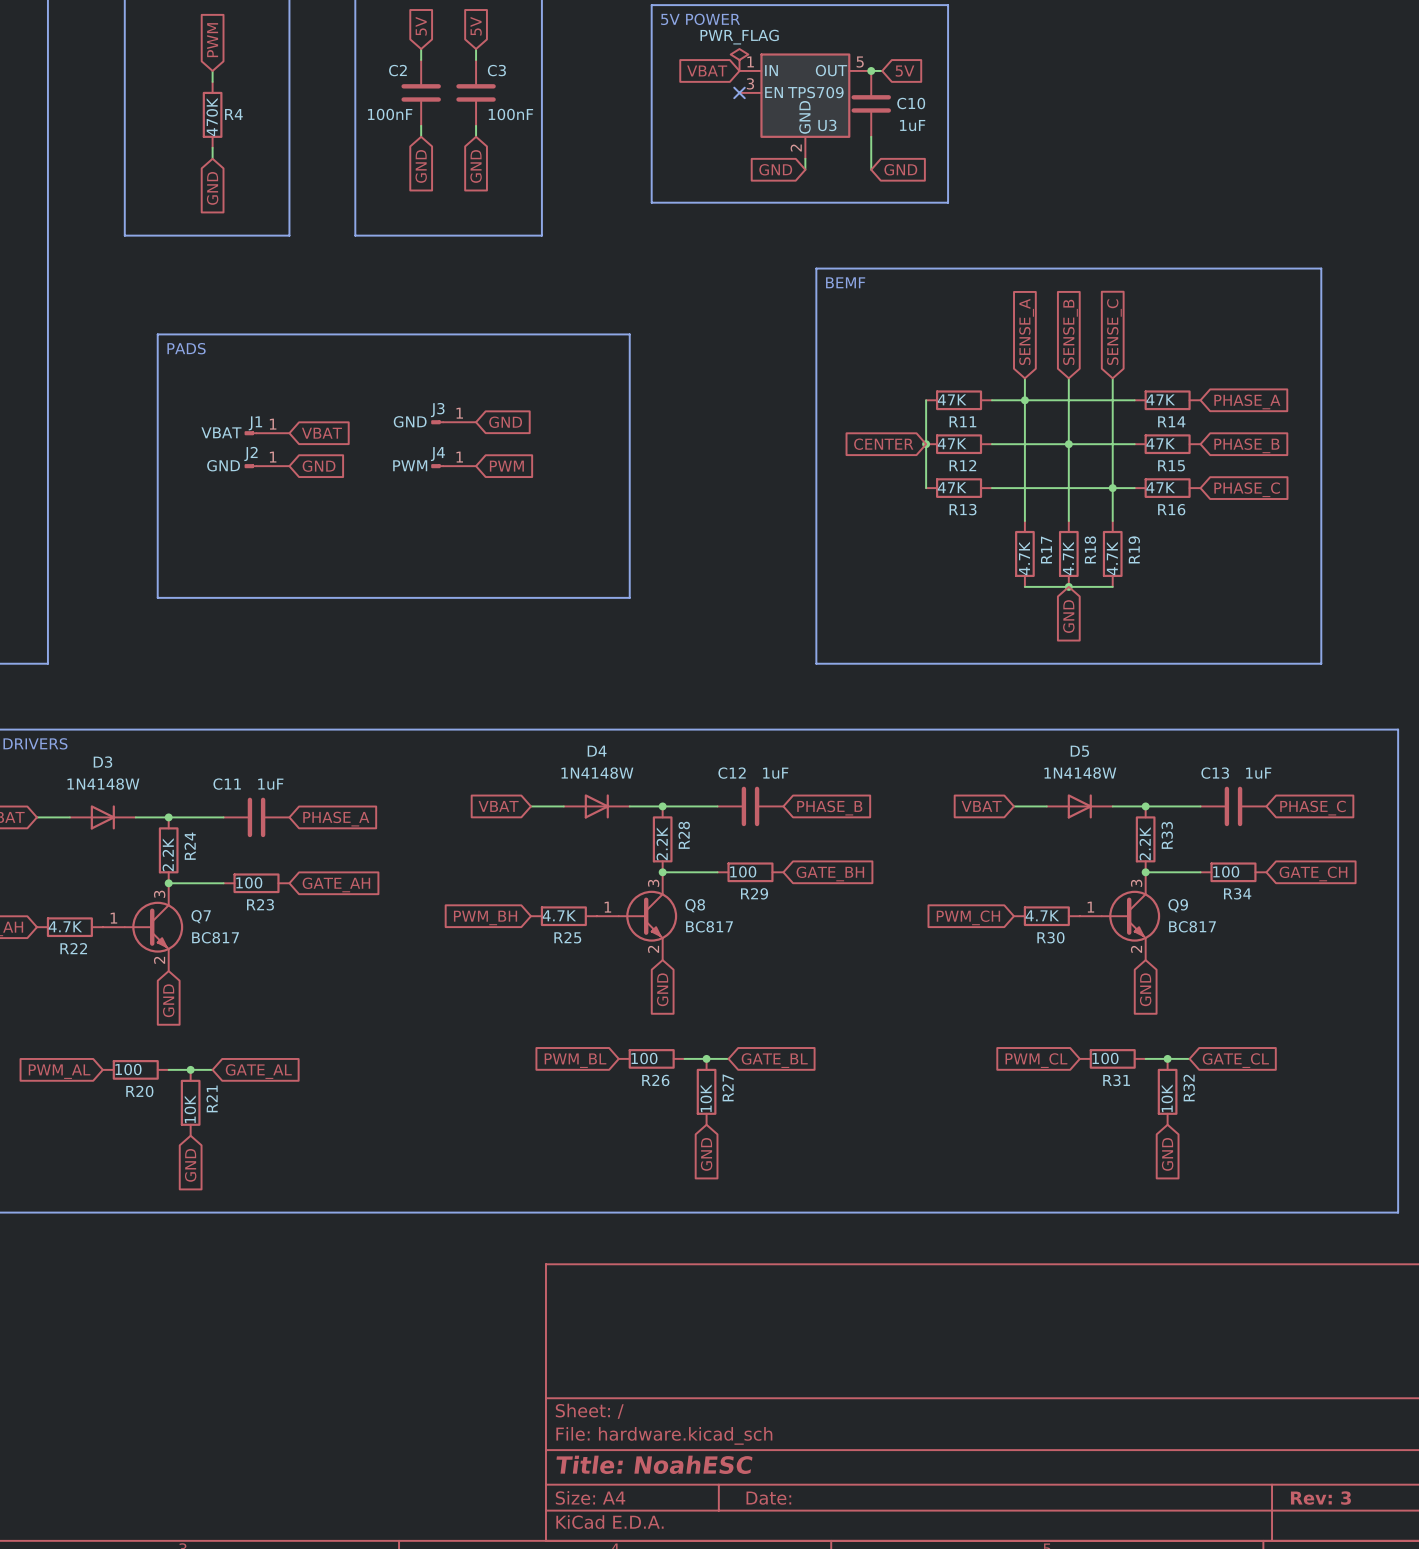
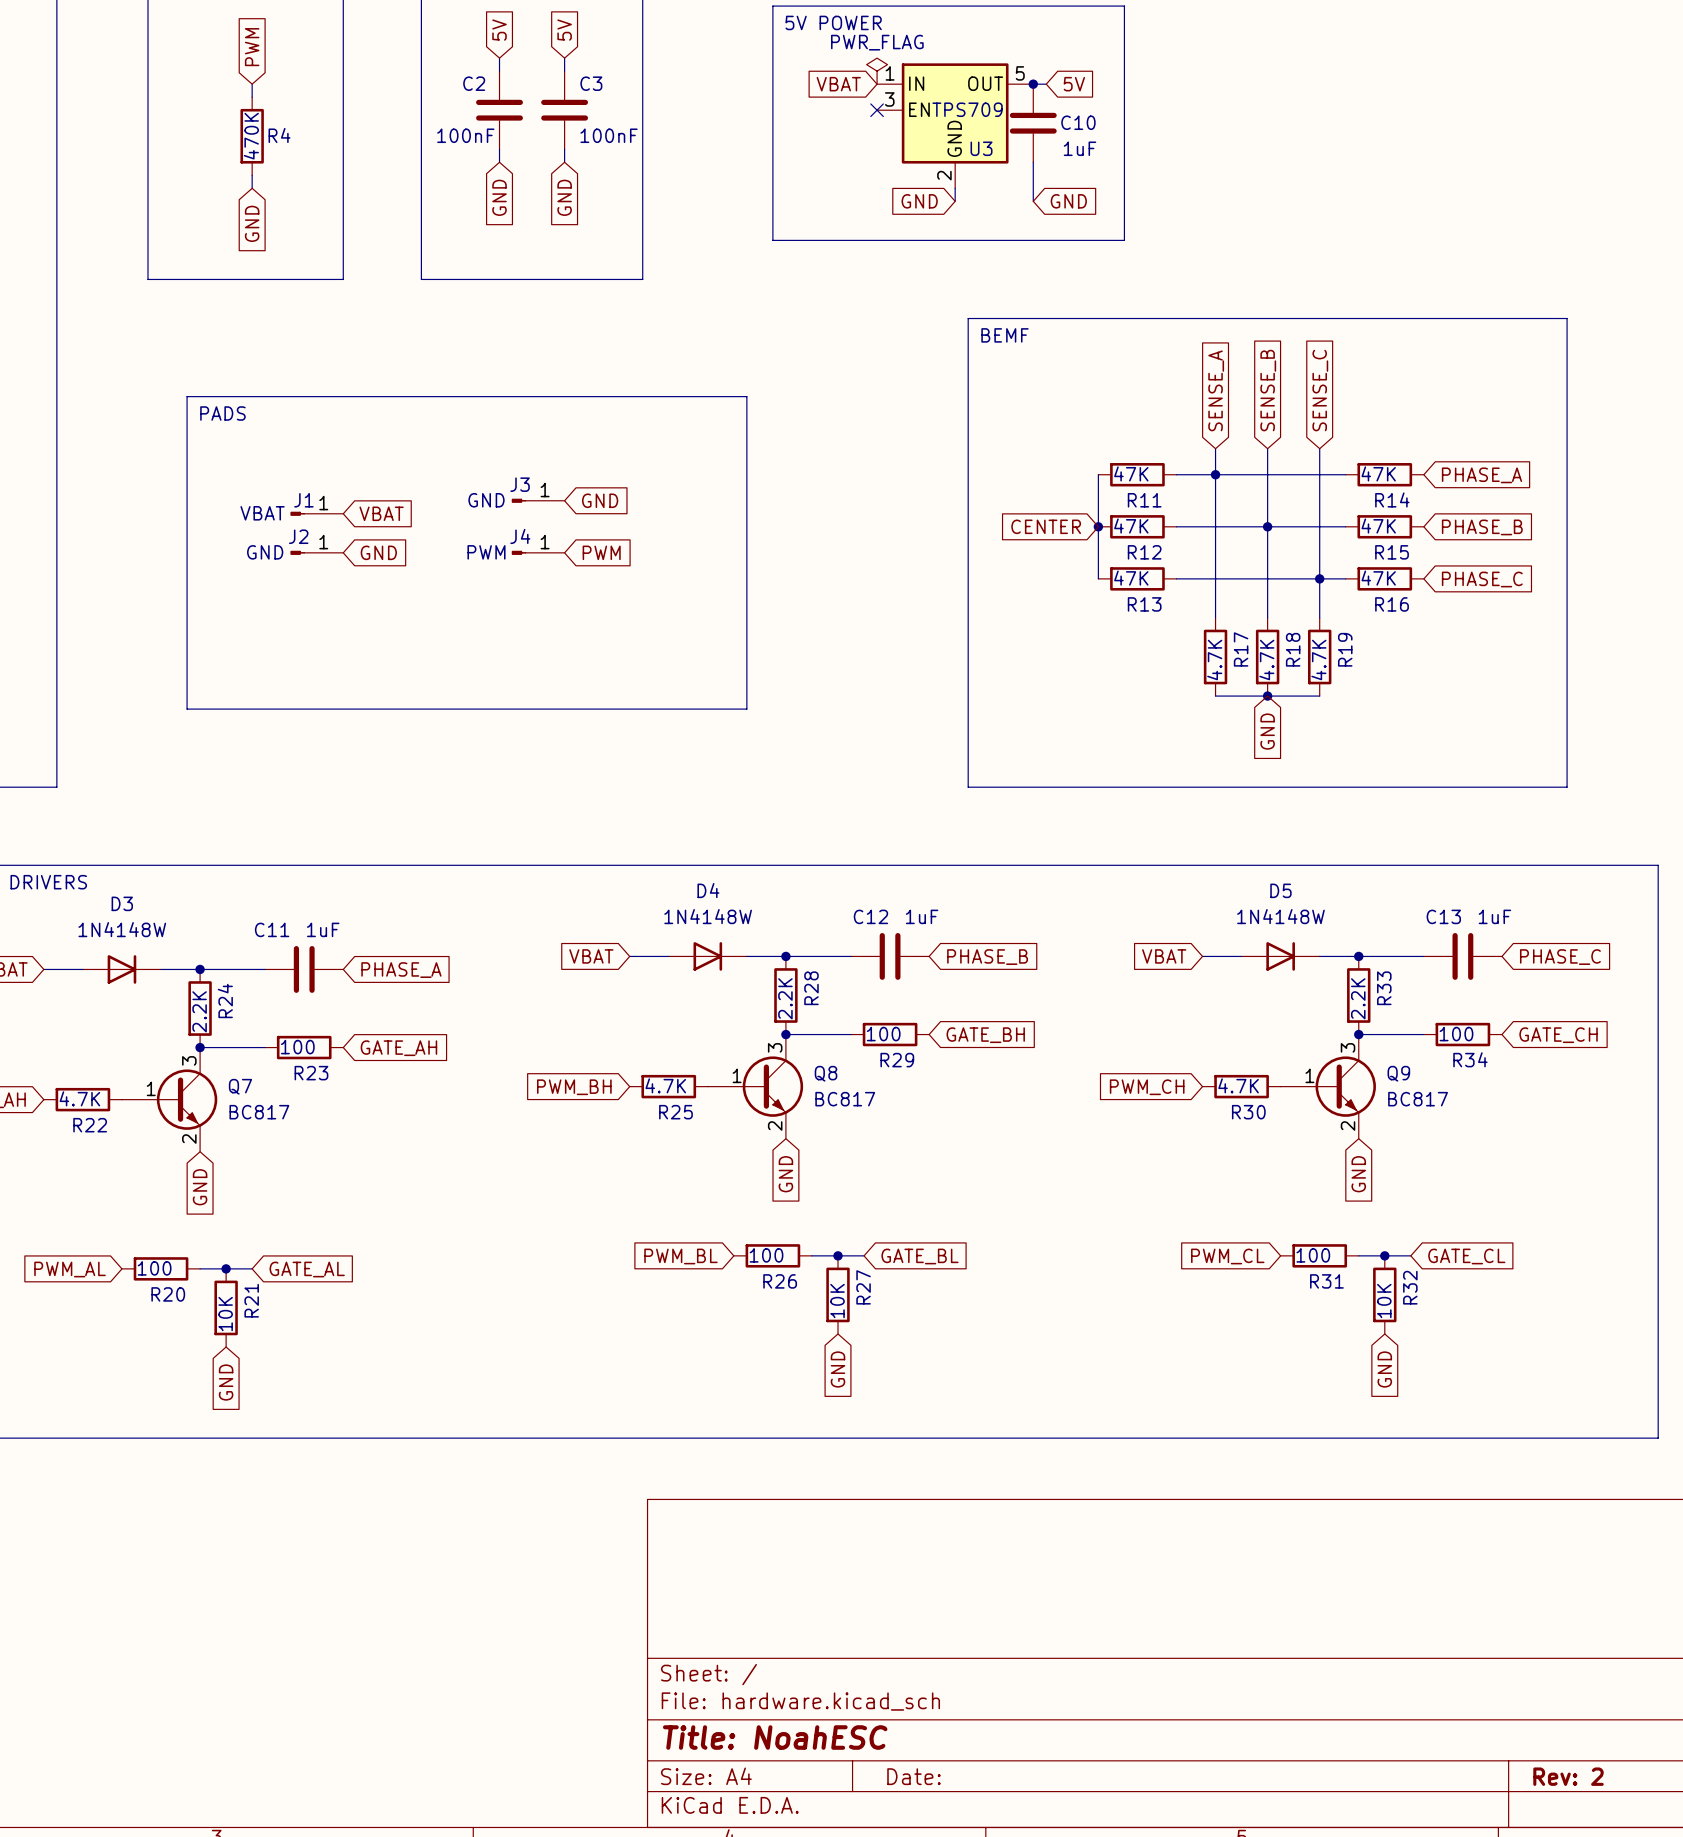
Q8 symbol: [596, 872, 678, 961] -> [707, 1034, 804, 1139]
Q9 symbol: [1079, 872, 1161, 961] -> [1280, 1034, 1376, 1139]
Q7 symbol: [102, 883, 184, 972] -> [121, 1047, 218, 1152]
title block: Rev: 3 (1320, 1498) -> Rev: 2 (1568, 1776)

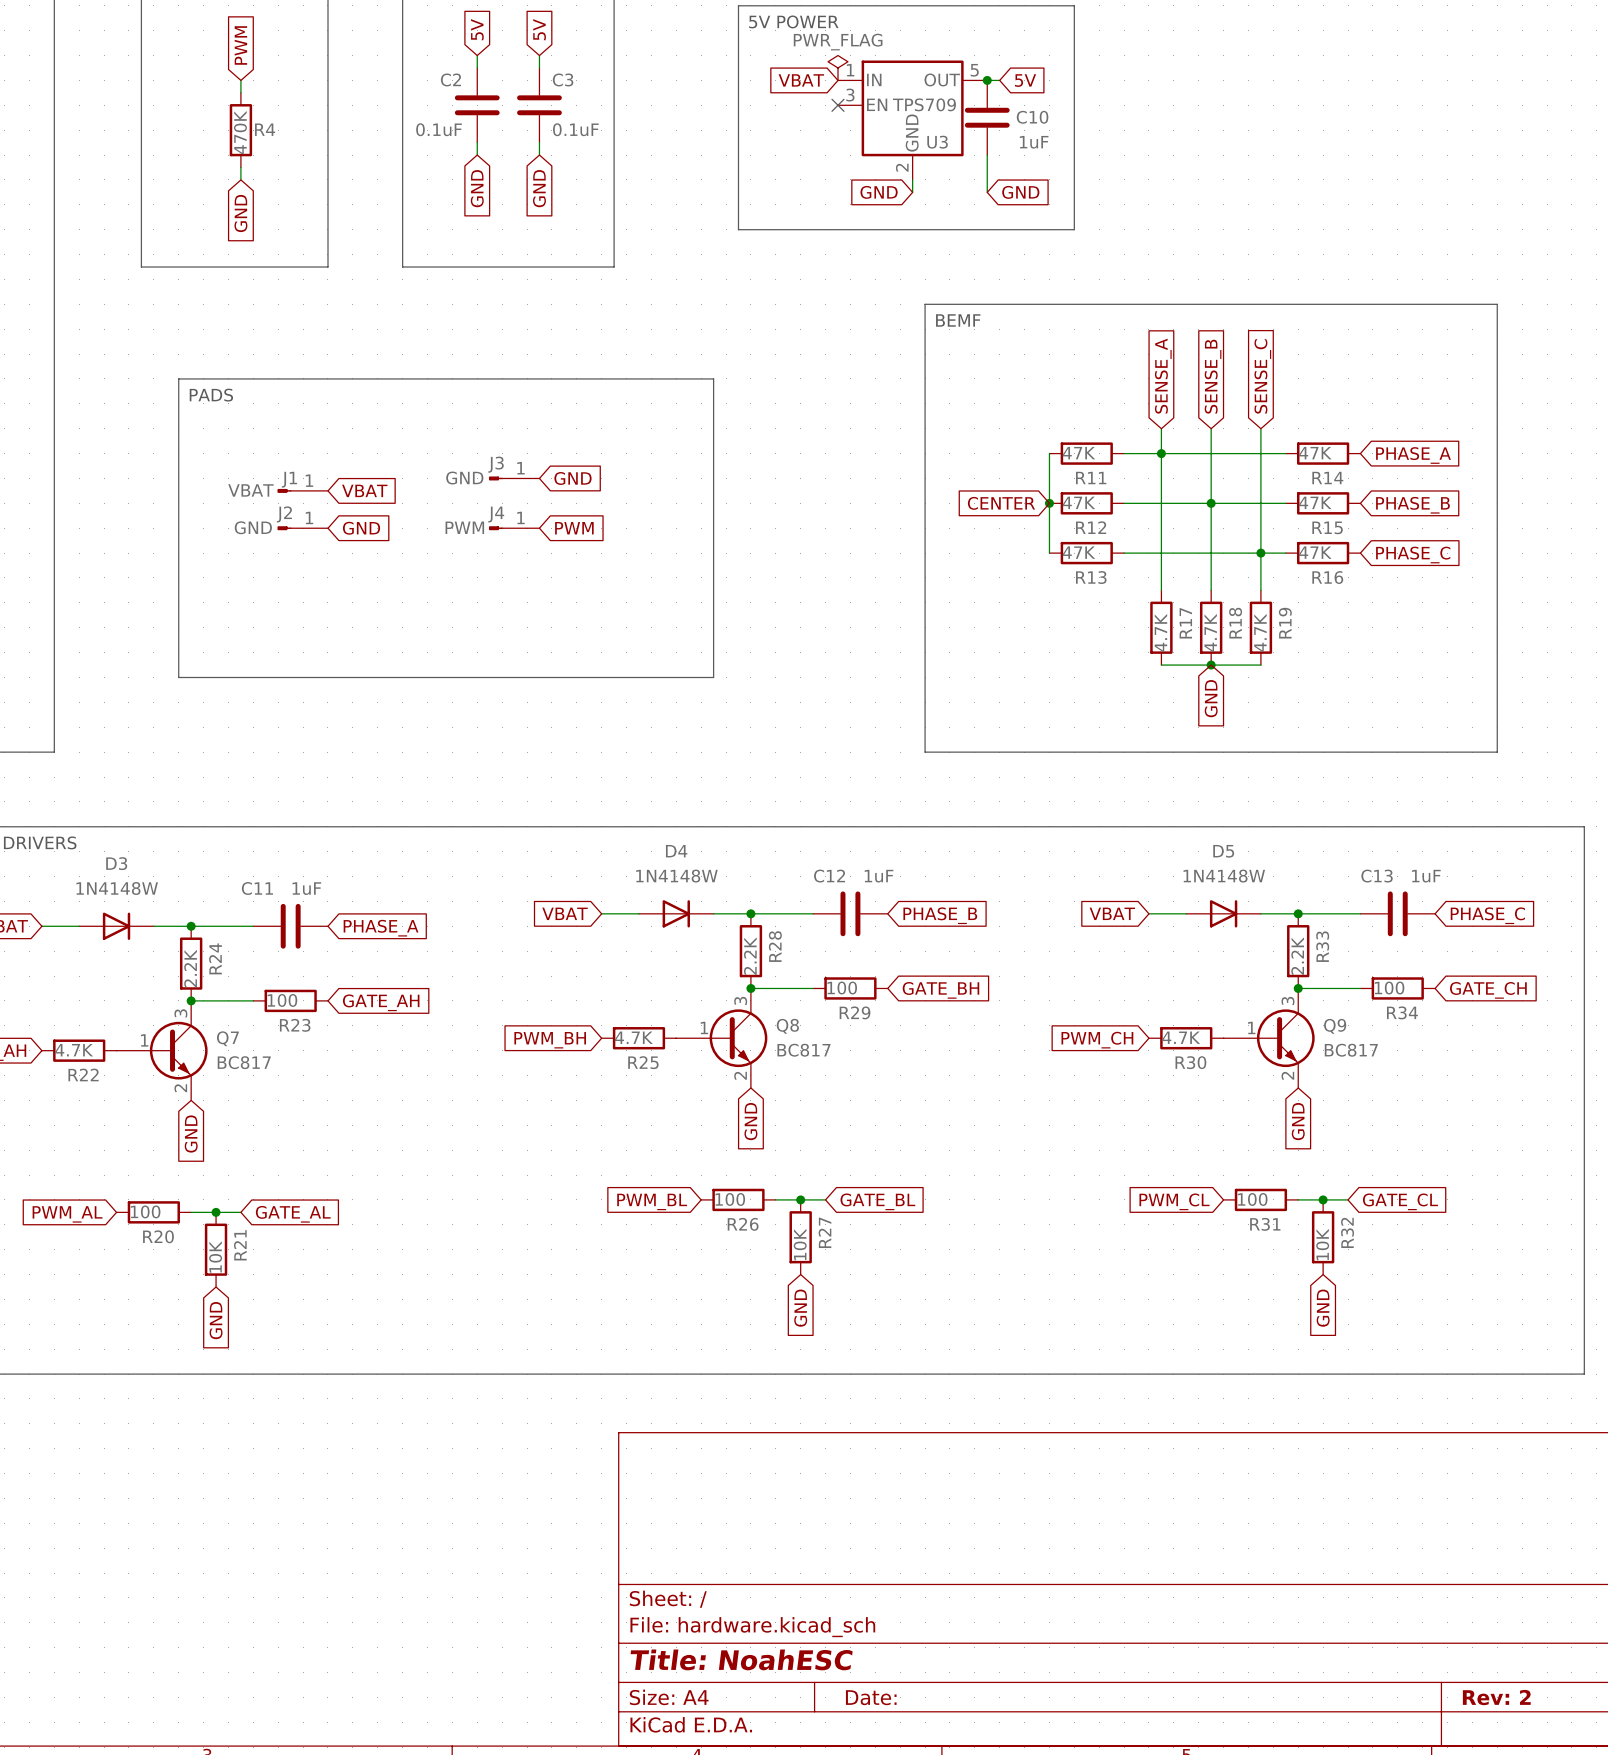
C2 value: 100nF (465, 135) -> 0.1uF (439, 129)
C3 value: 100nF (609, 135) -> 0.1uF (575, 129)

